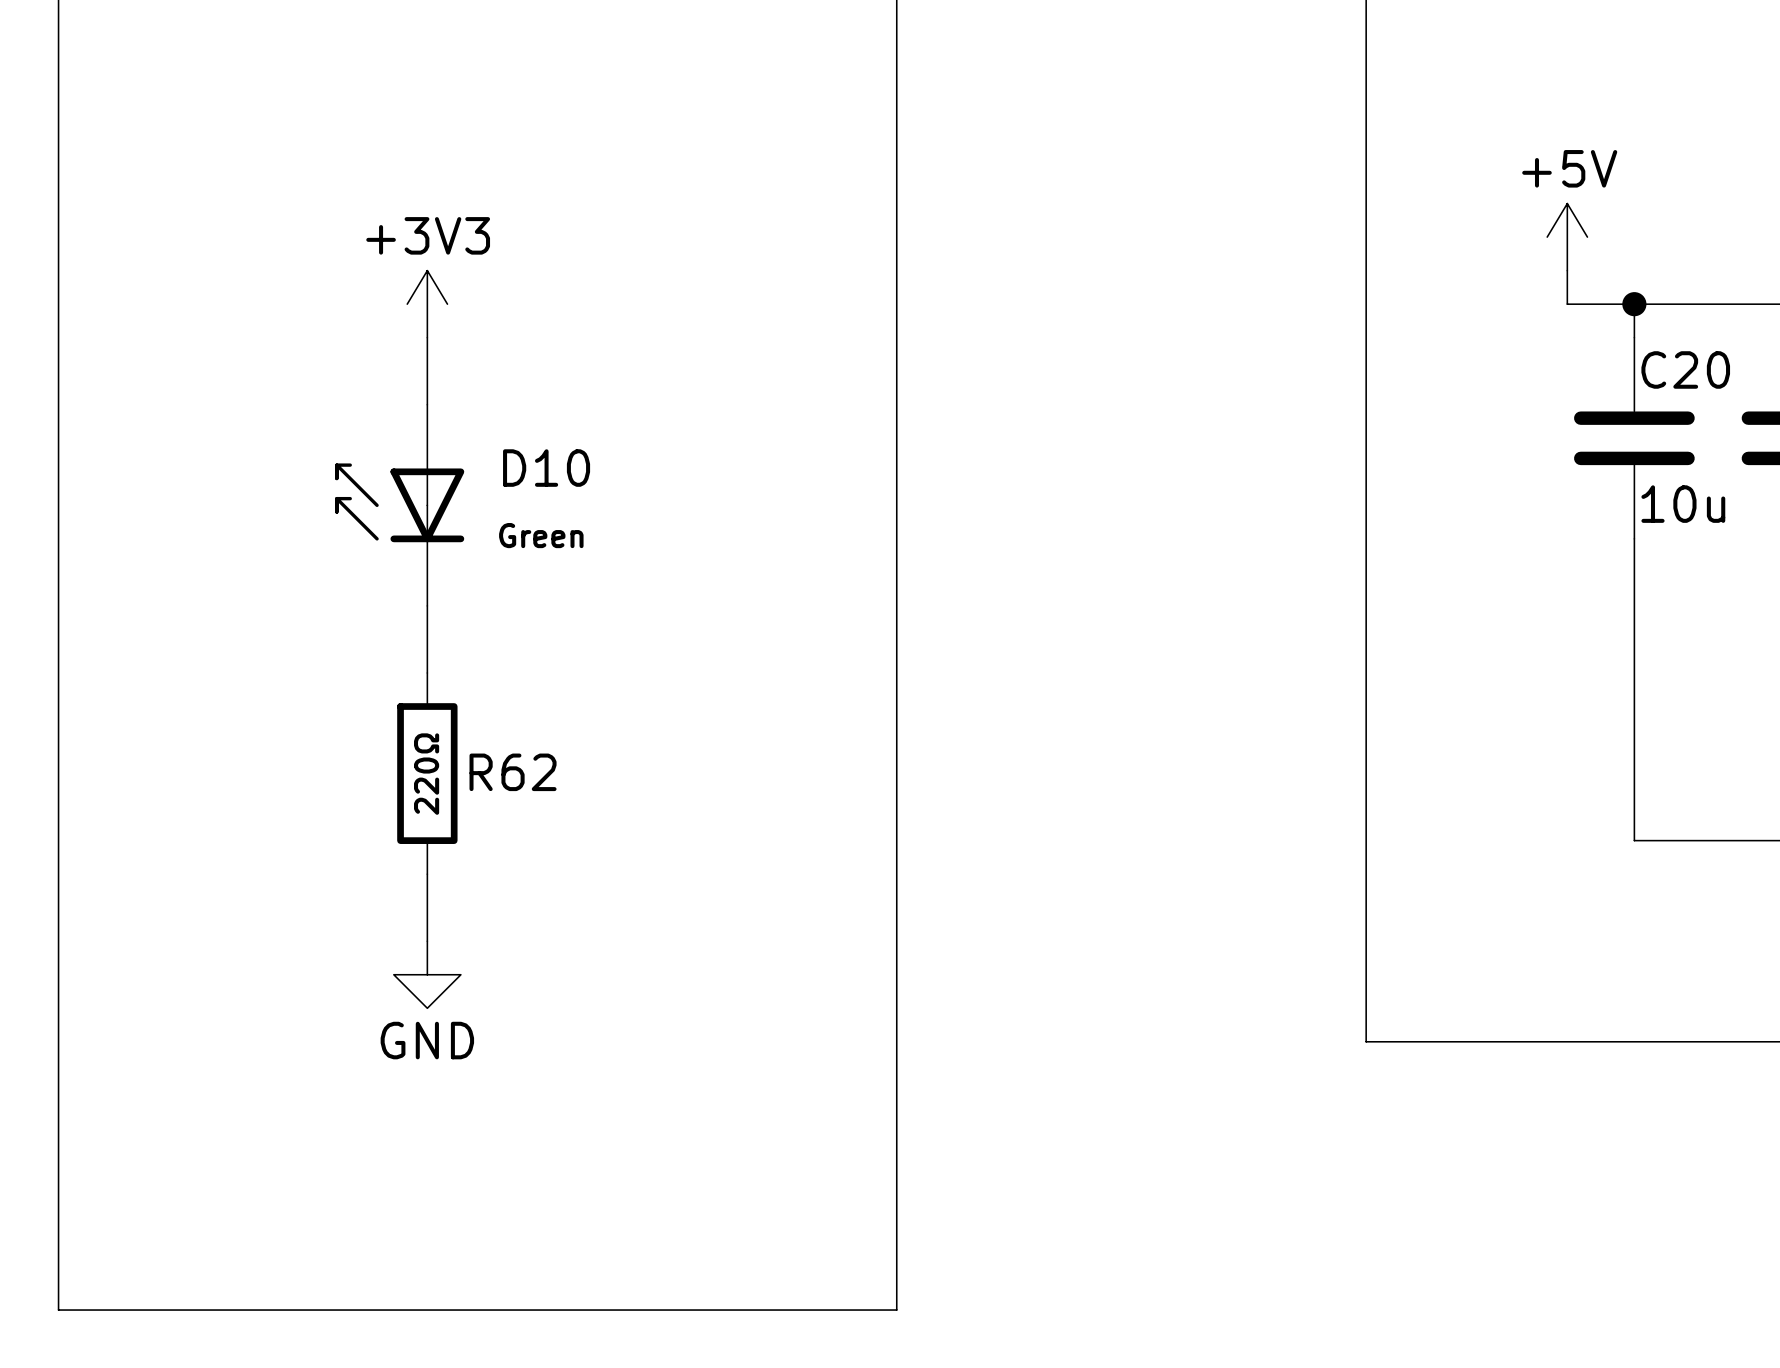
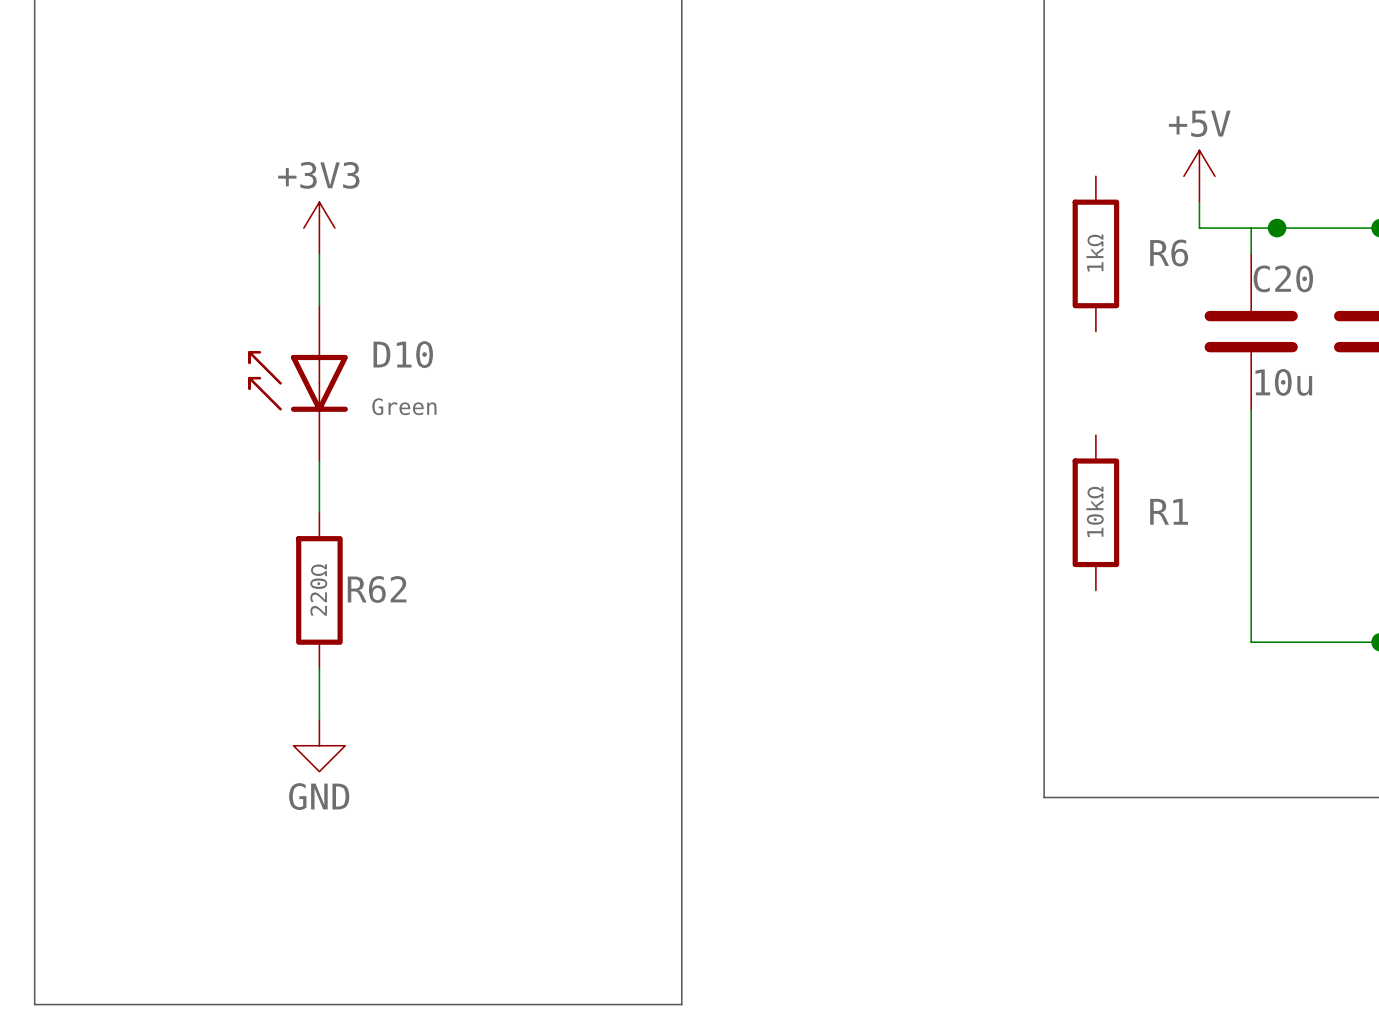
junction position: (1634, 304) -> (1277, 228)
R6: none -> 1kΩ (1095, 253)
R1: none -> 10kΩ (1095, 512)

